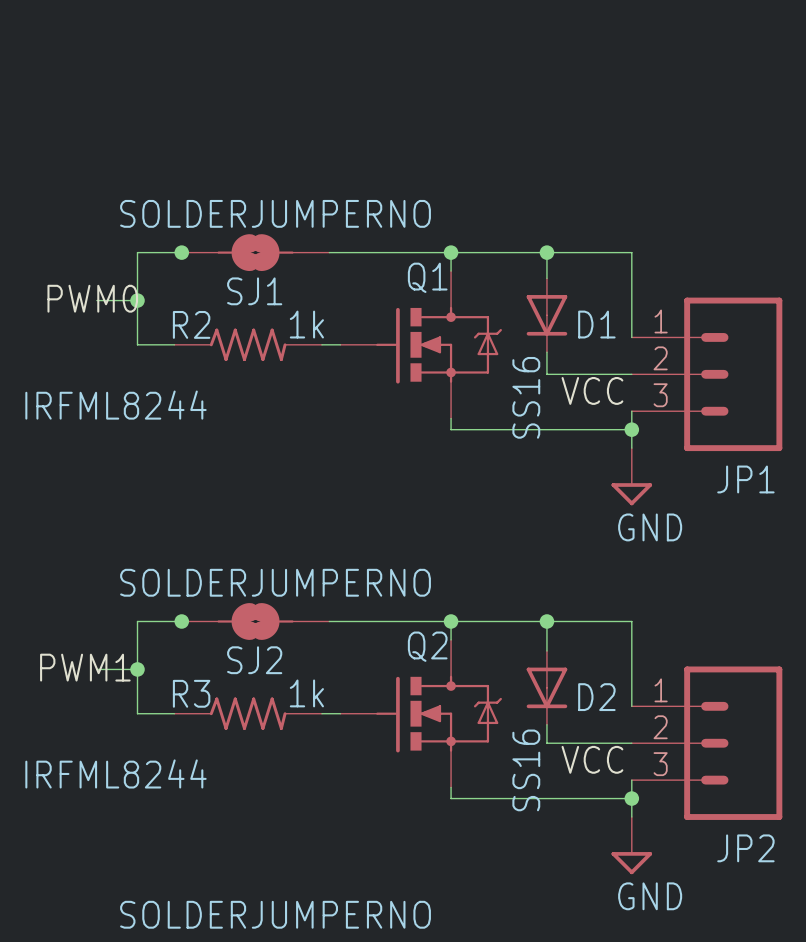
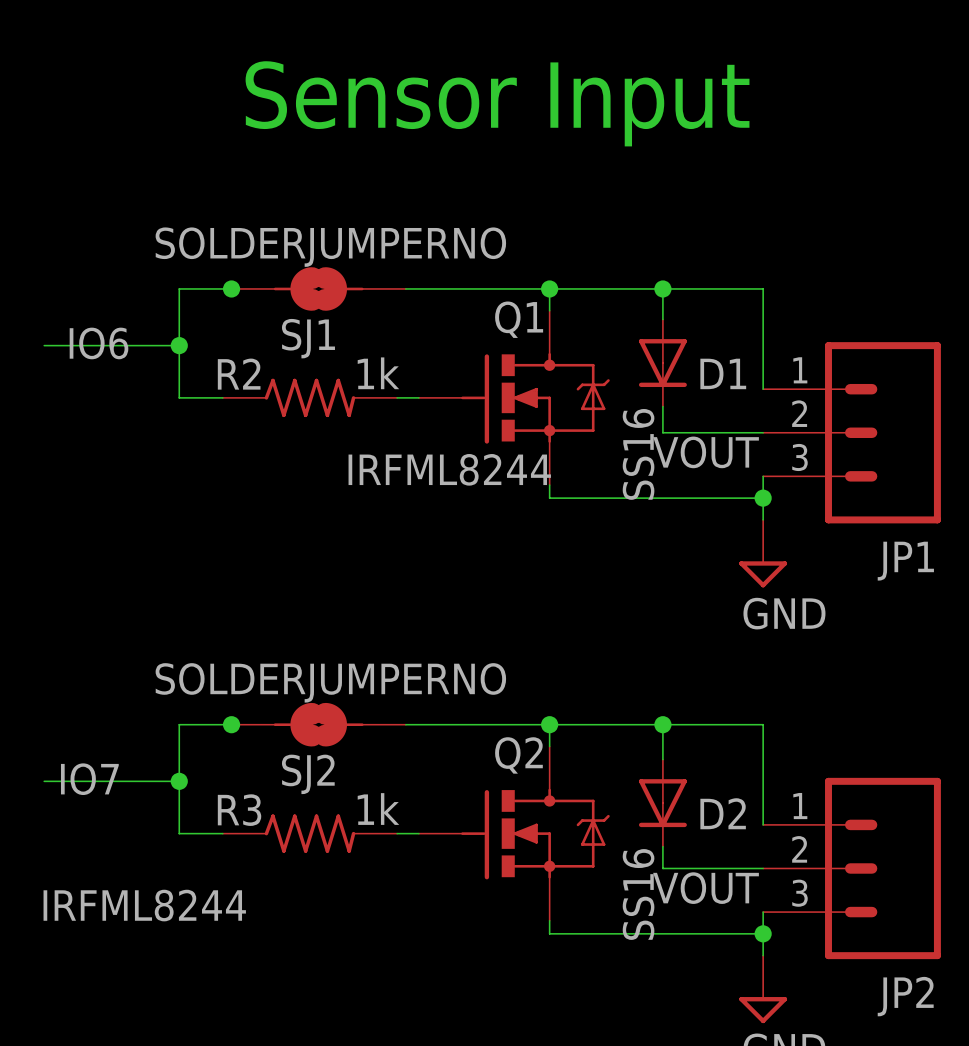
text: none -> Sensor Input (497, 103)
label: PWM0 (92, 298) -> IO6 (98, 343)
wire: none -> (44, 345) (131, 345)
label: VCC (592, 390) -> VOUT (706, 452)
Q1 value position: IRFML8244 (115, 405) -> IRFML8244 (449, 469)
label: PWM1 (85, 667) -> IO7 (89, 779)
wire: none -> (44, 781) (131, 781)
label: VCC (592, 759) -> VOUT (706, 888)

